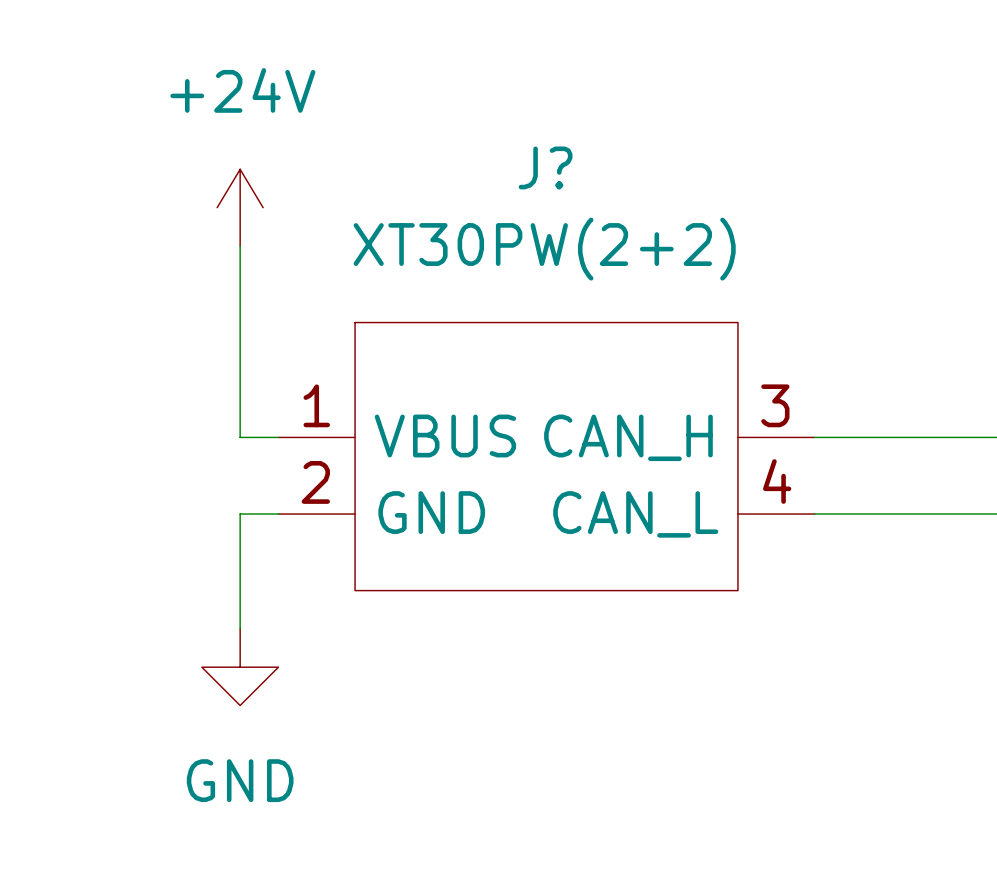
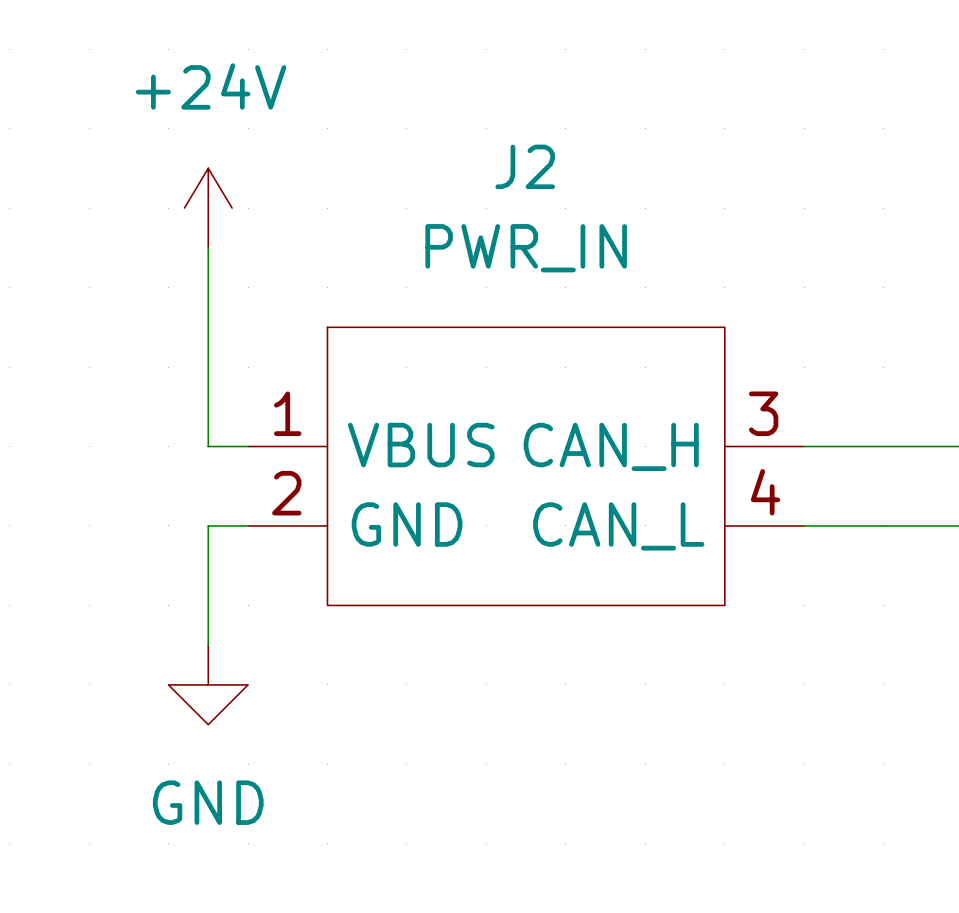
J? name: J? (545, 167) -> J2 (525, 166)
J? value: XT30PW(2+2) (544, 249) -> PWR_IN (526, 248)

